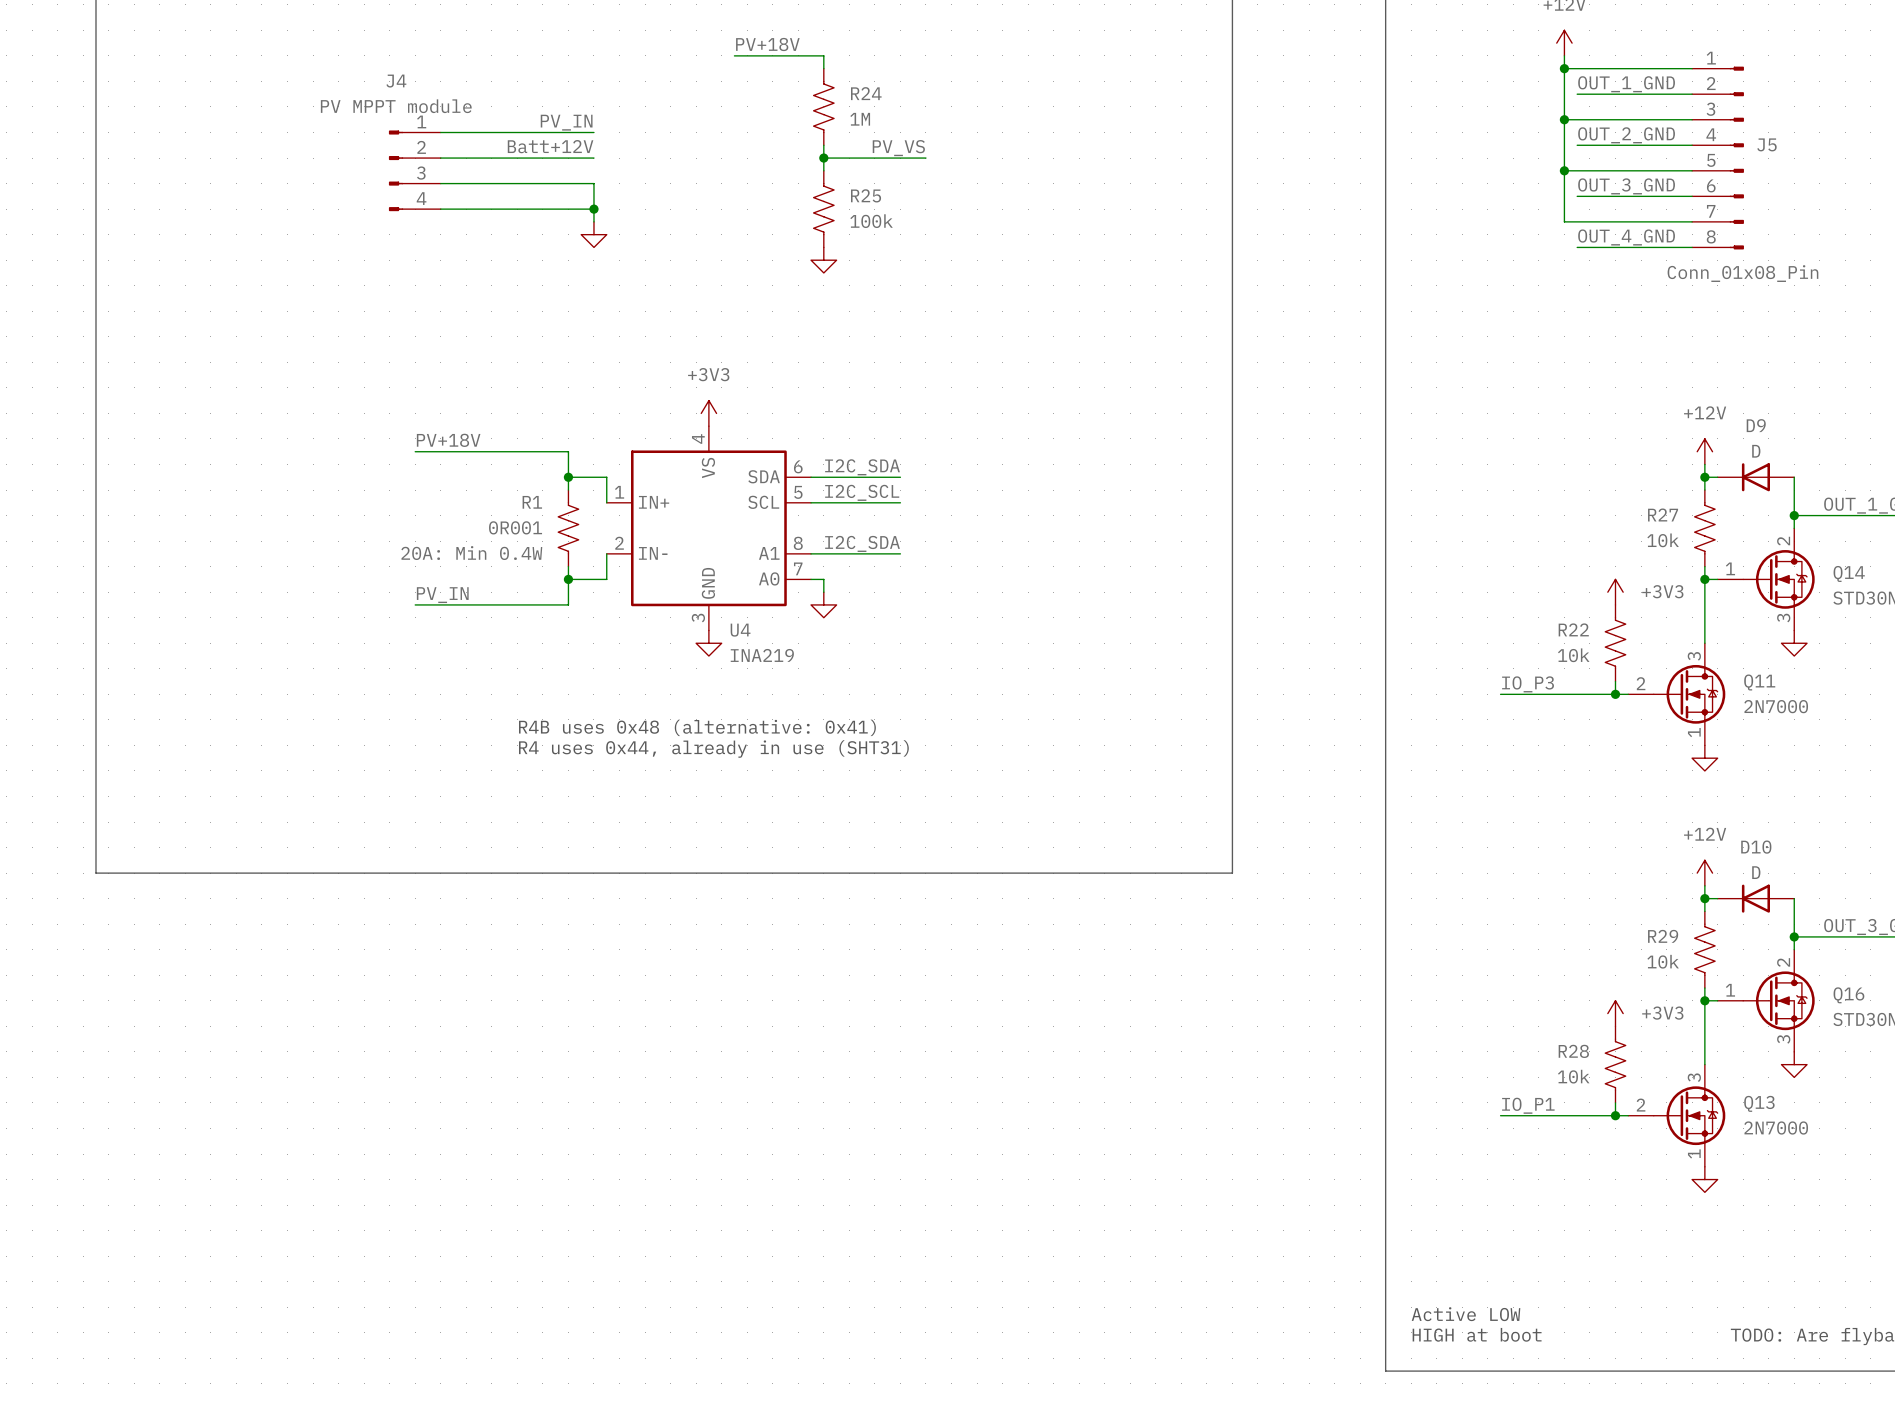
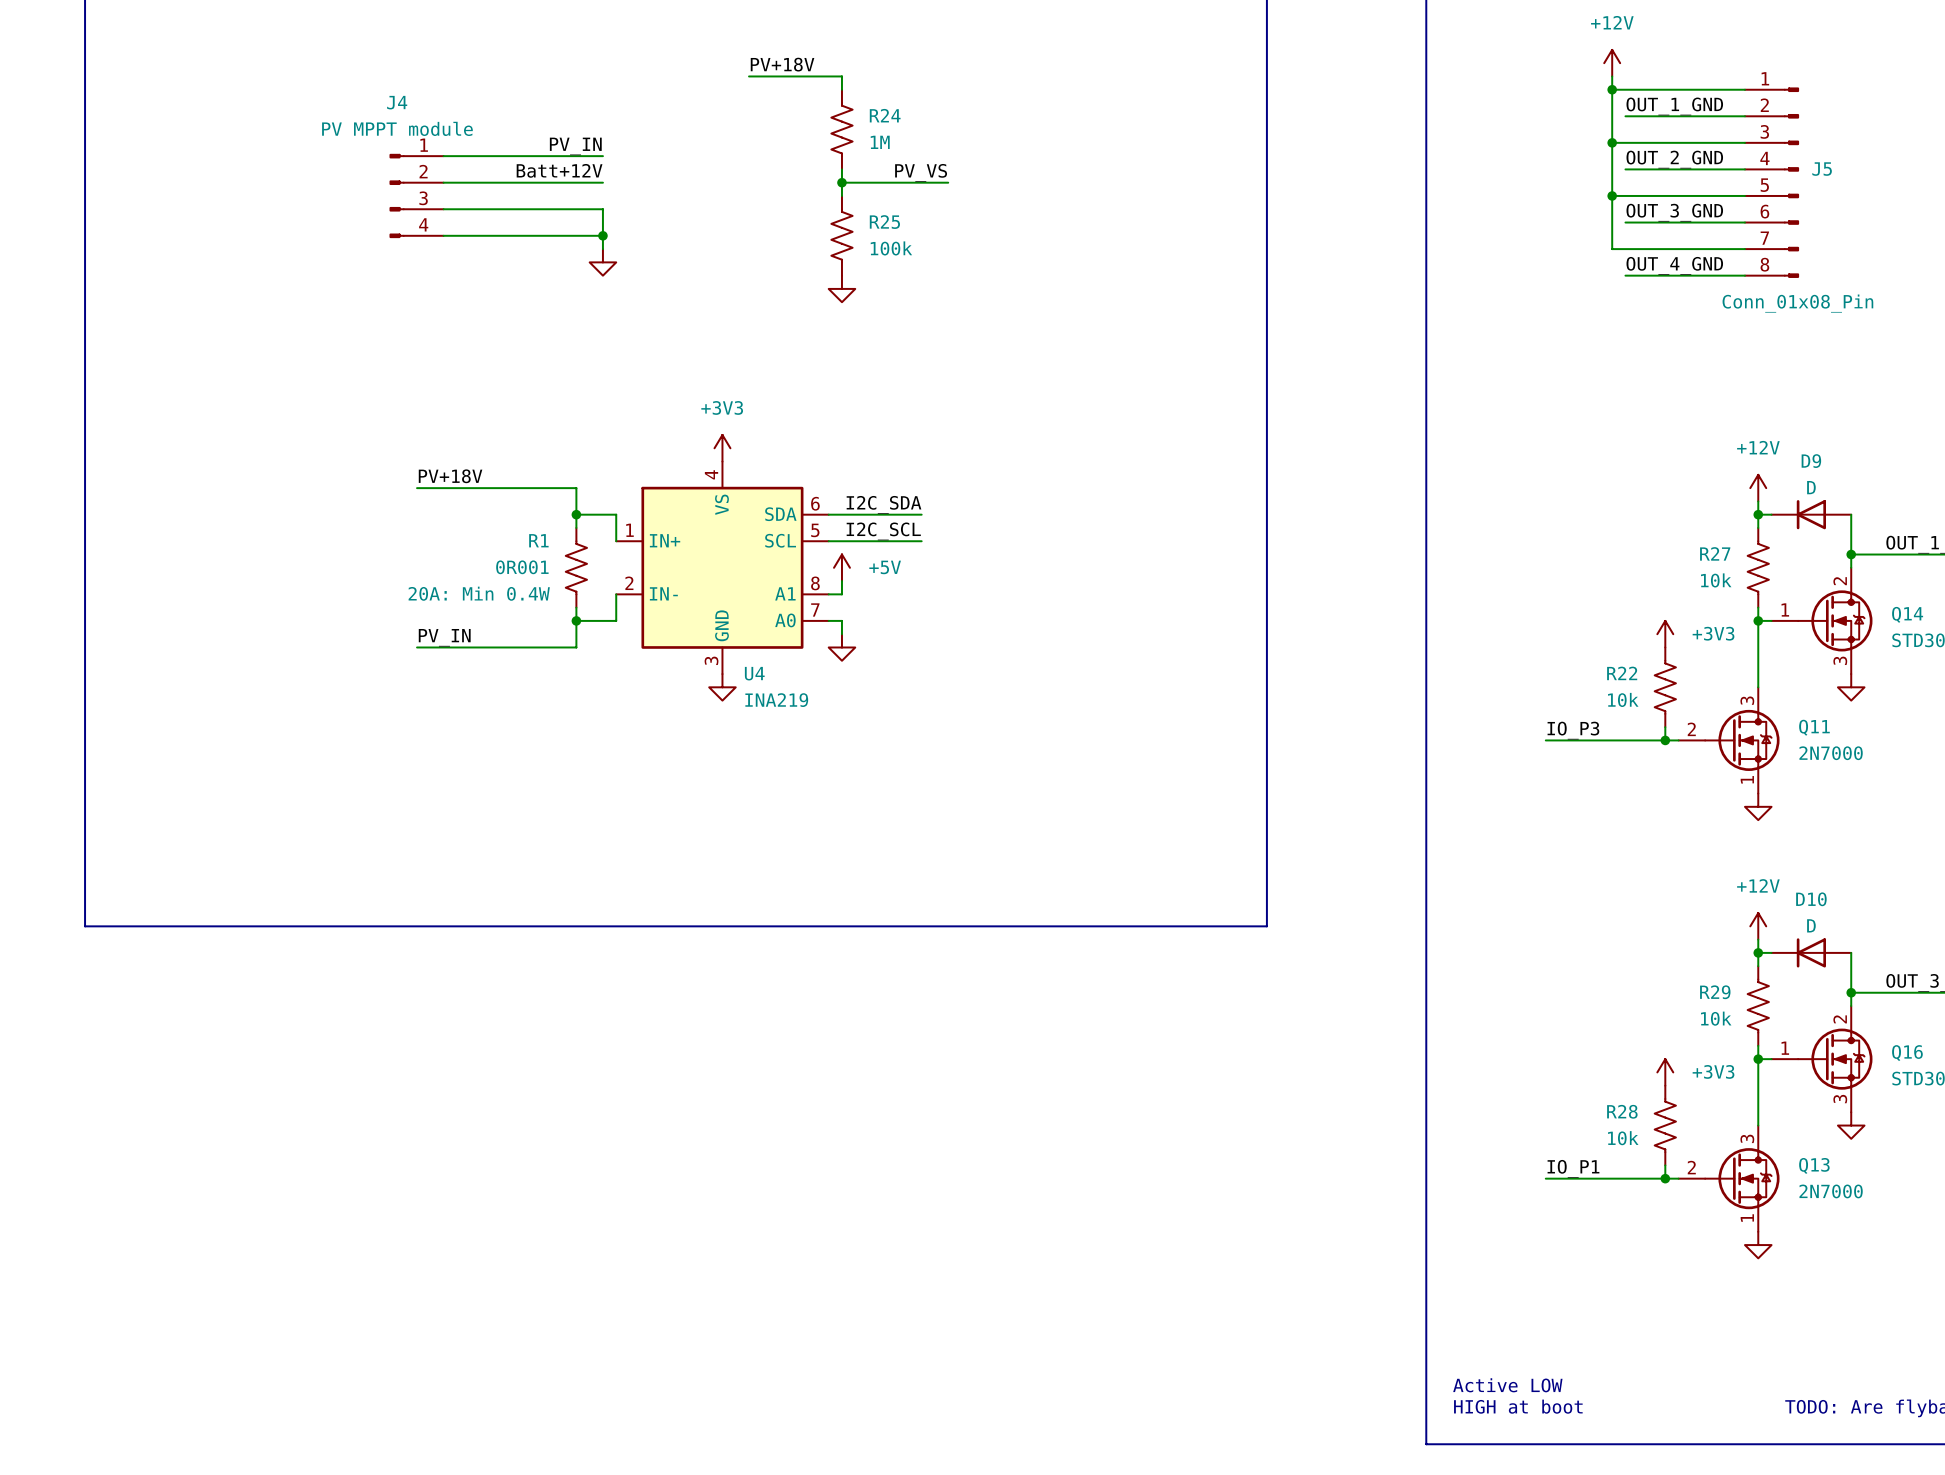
power symbol: none -> +5V (841, 567)
label: I2C_SDA (862, 543) -> none
wire: (823, 553) (900, 553) -> (841, 594) (841, 581)
text: R4B uses 0x48 (alternative: 0x41) (697, 727) -> none
text: R4 uses 0x44, already in use (SHT31) (713, 748) -> none

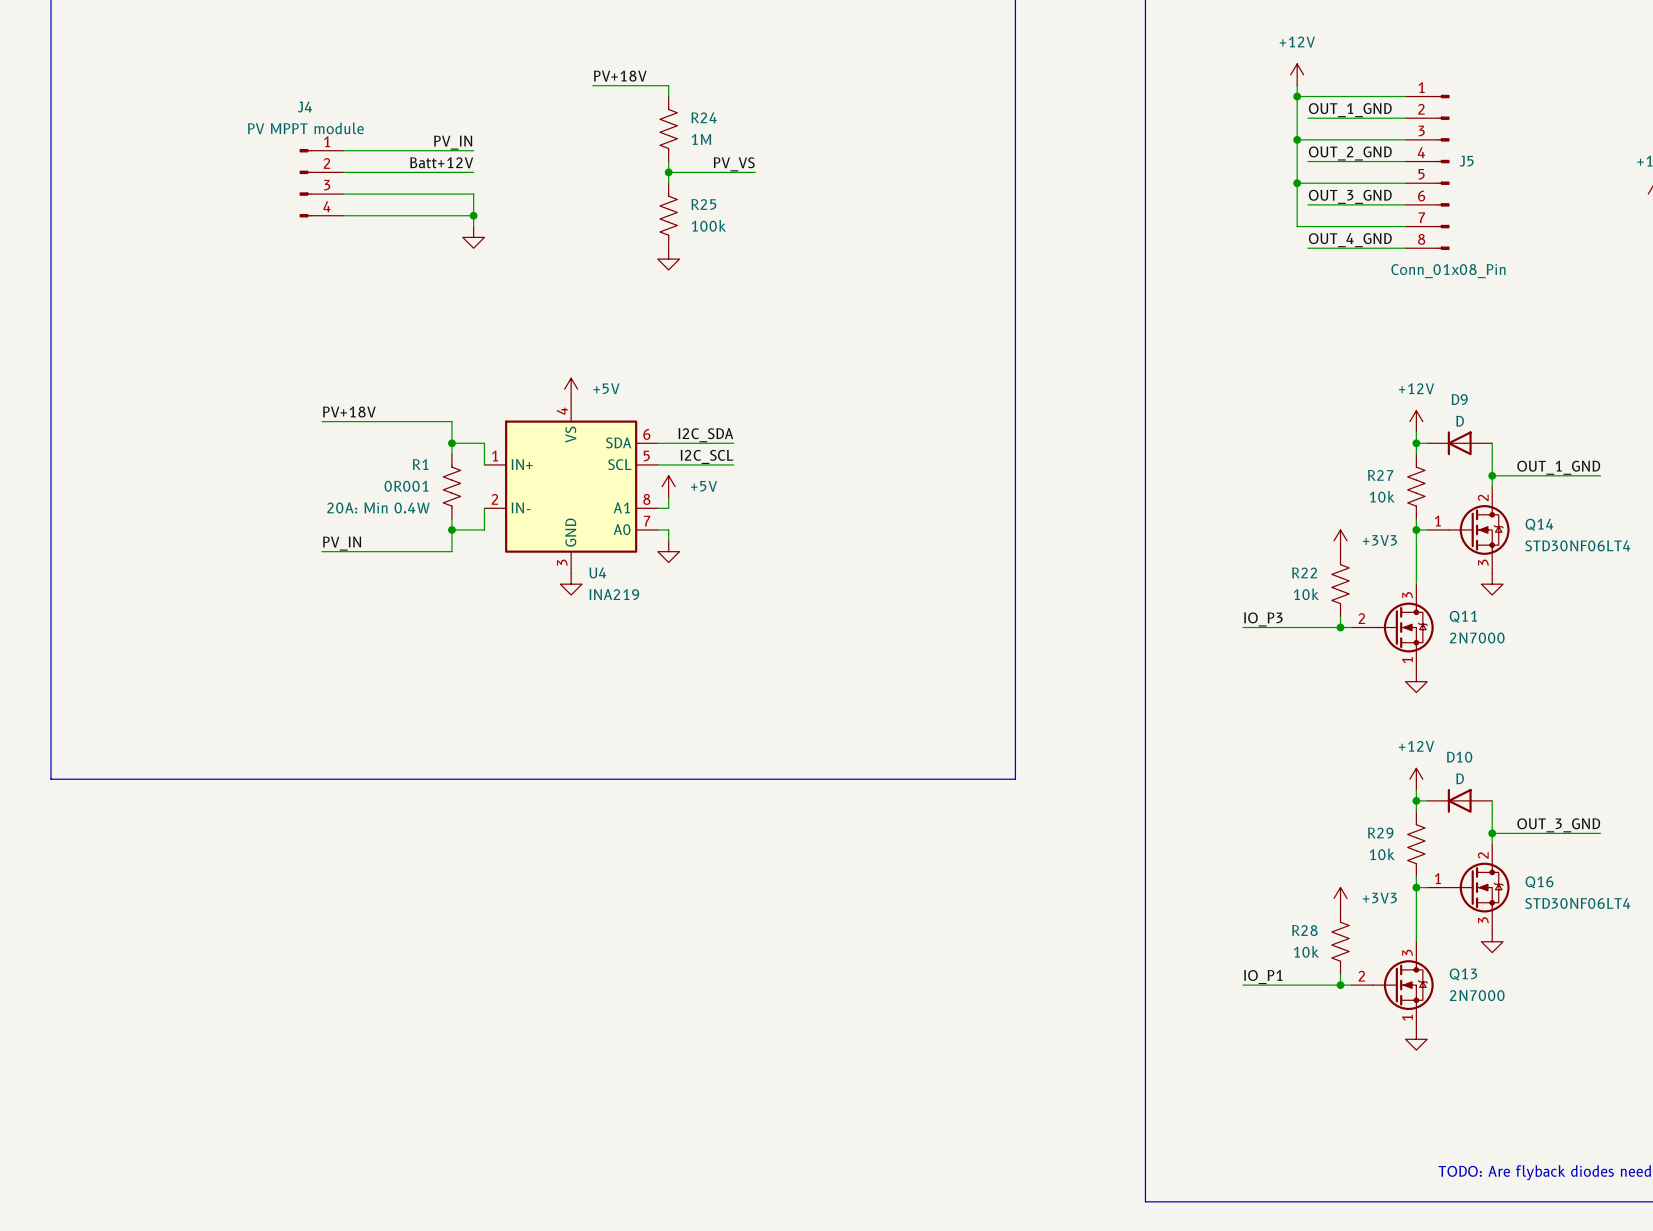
power symbol: +3V3 (722, 448) -> +5V (571, 389)
text: Active LOW (1507, 1385) -> none
text: HIGH at boot (1518, 1406) -> none

